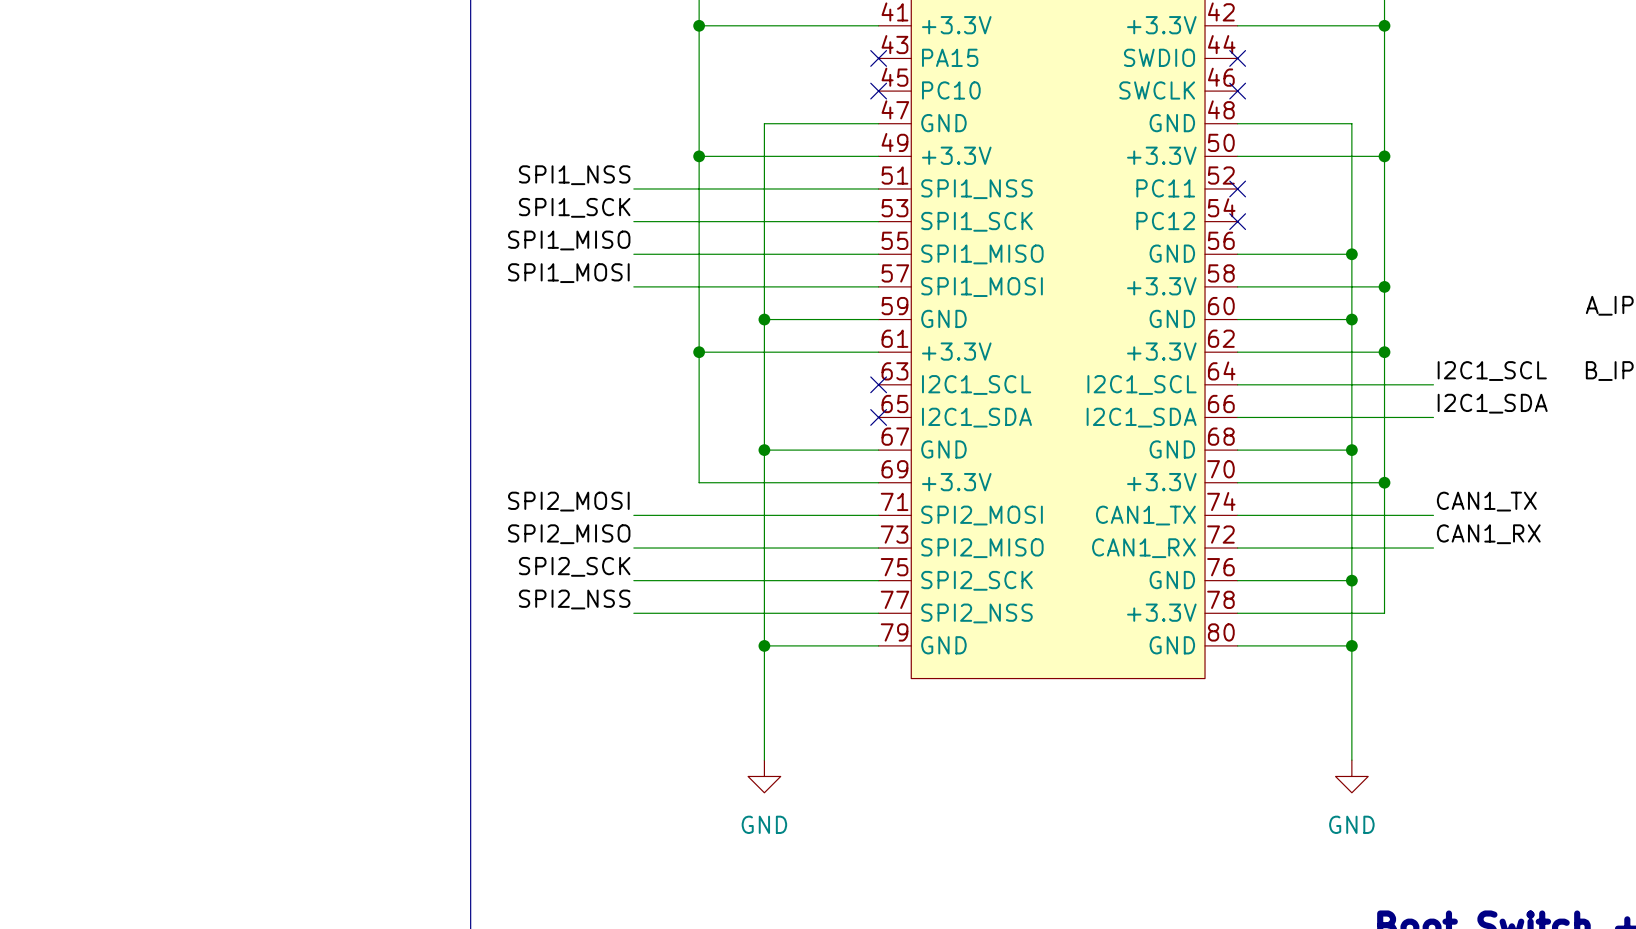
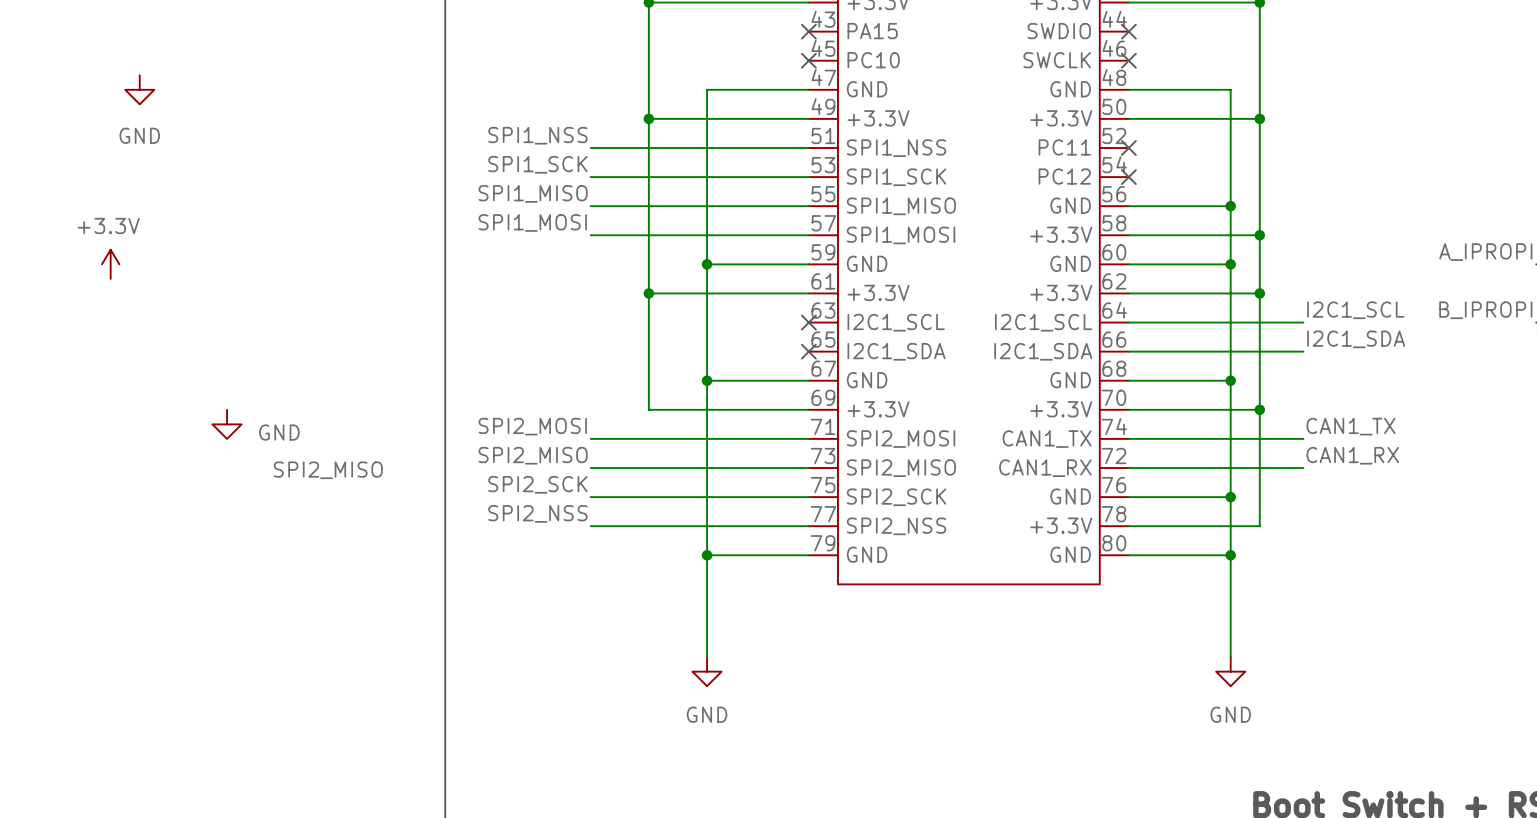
power symbol: none -> GND (139, 89)
power symbol: none -> +3.3V (110, 264)
power symbol: none -> GND (227, 424)
label: none -> SPI2_MISO (328, 470)

